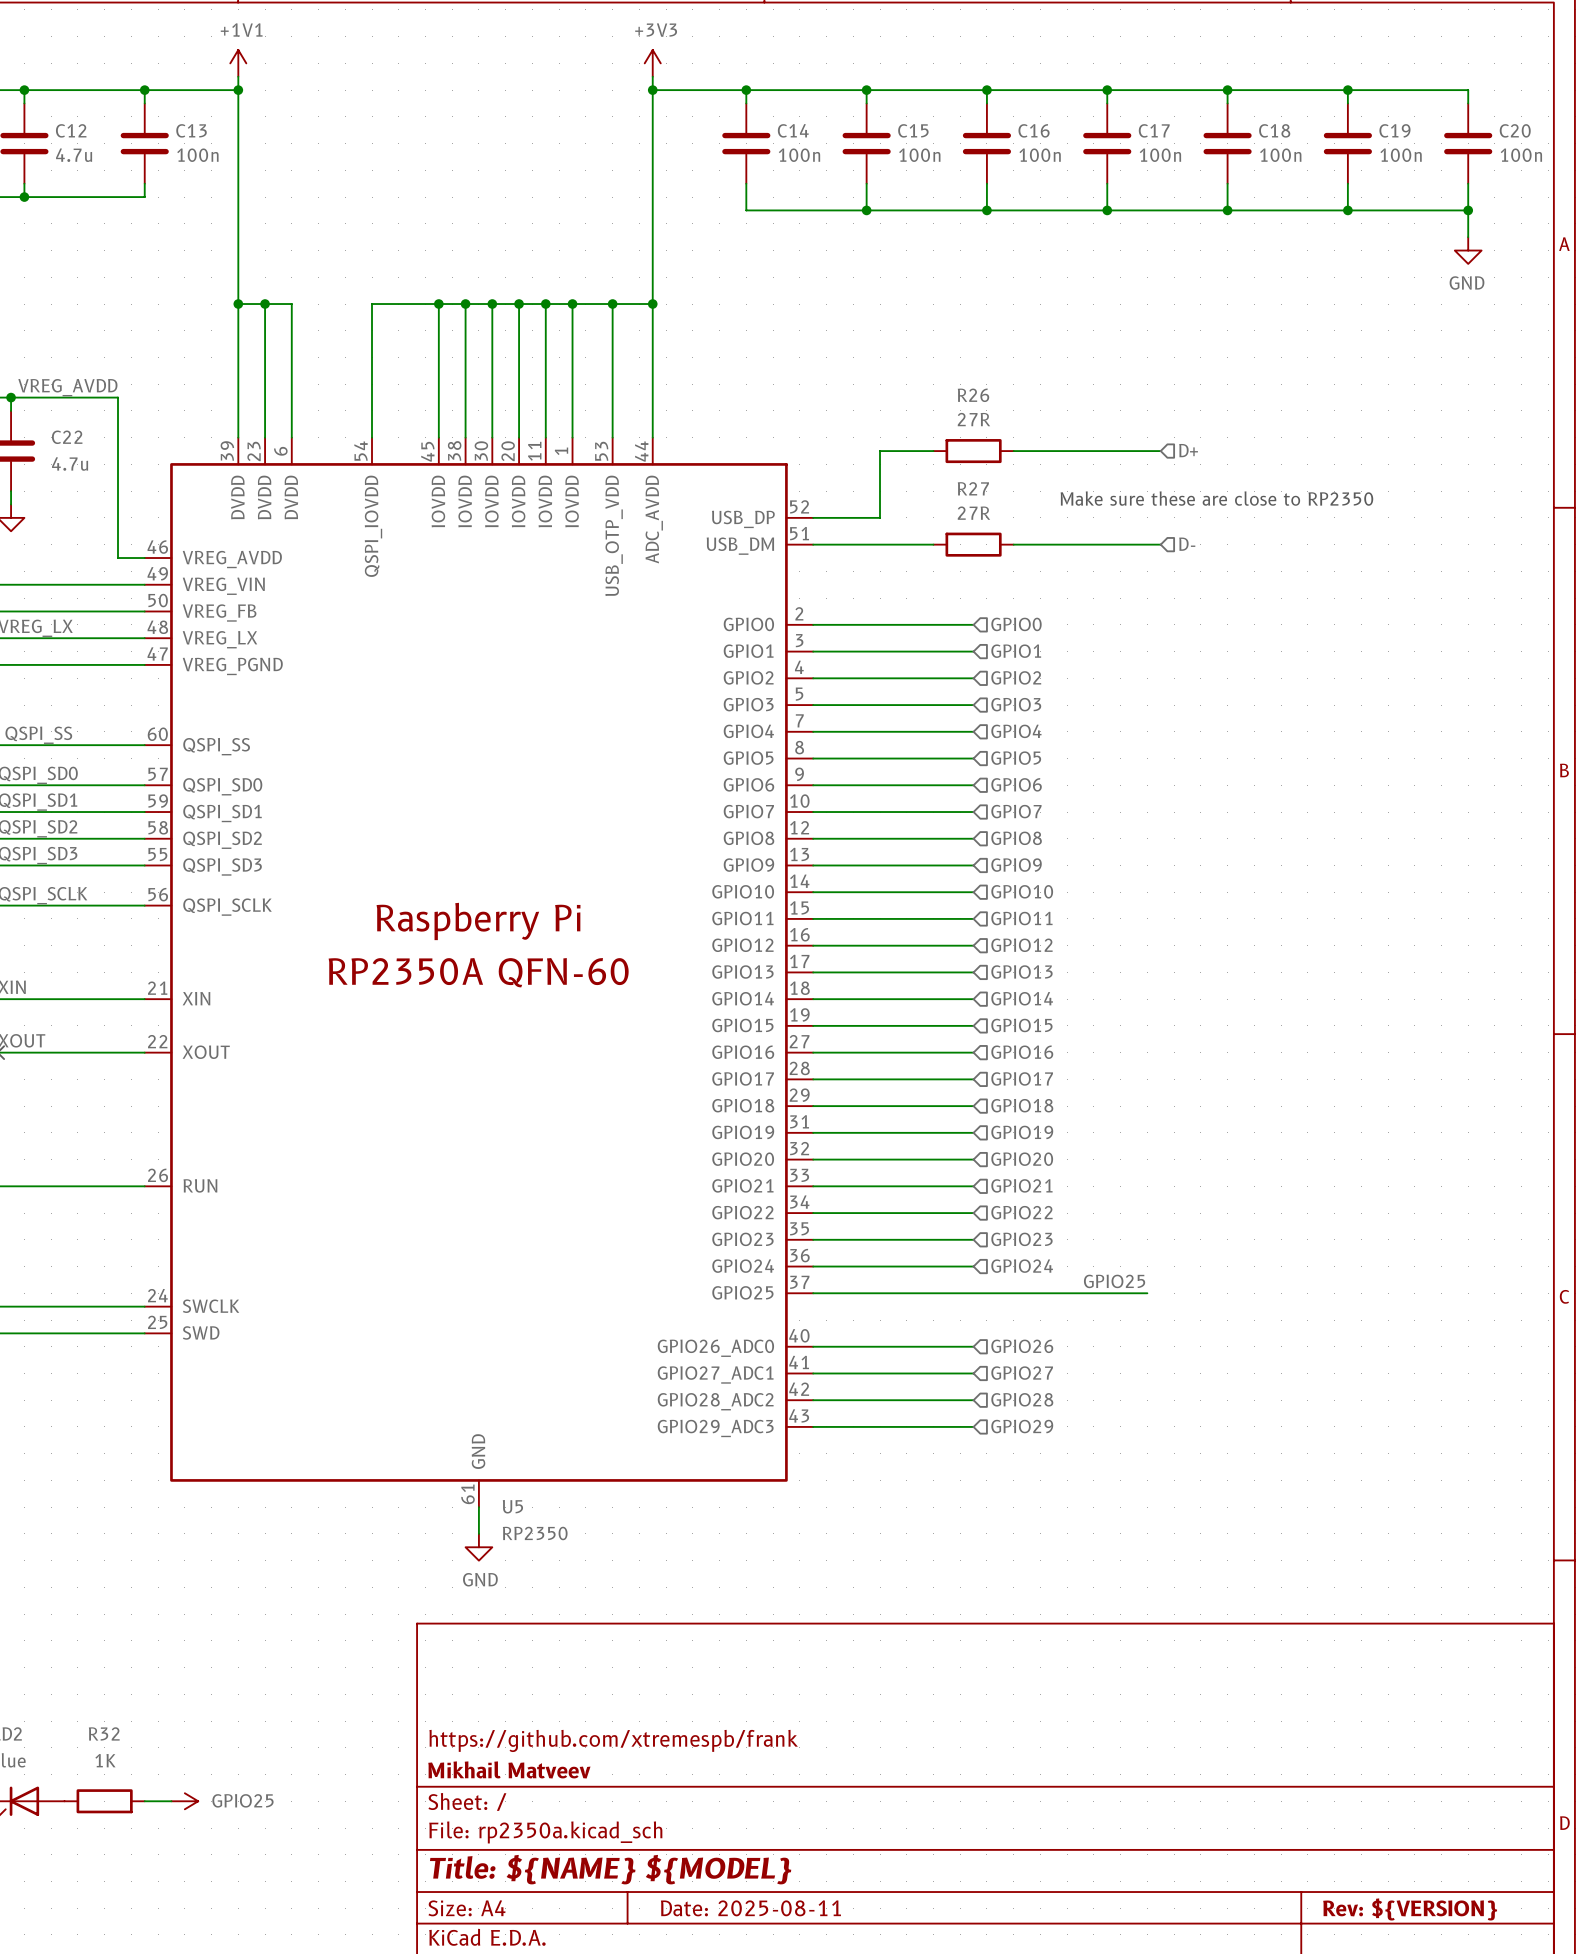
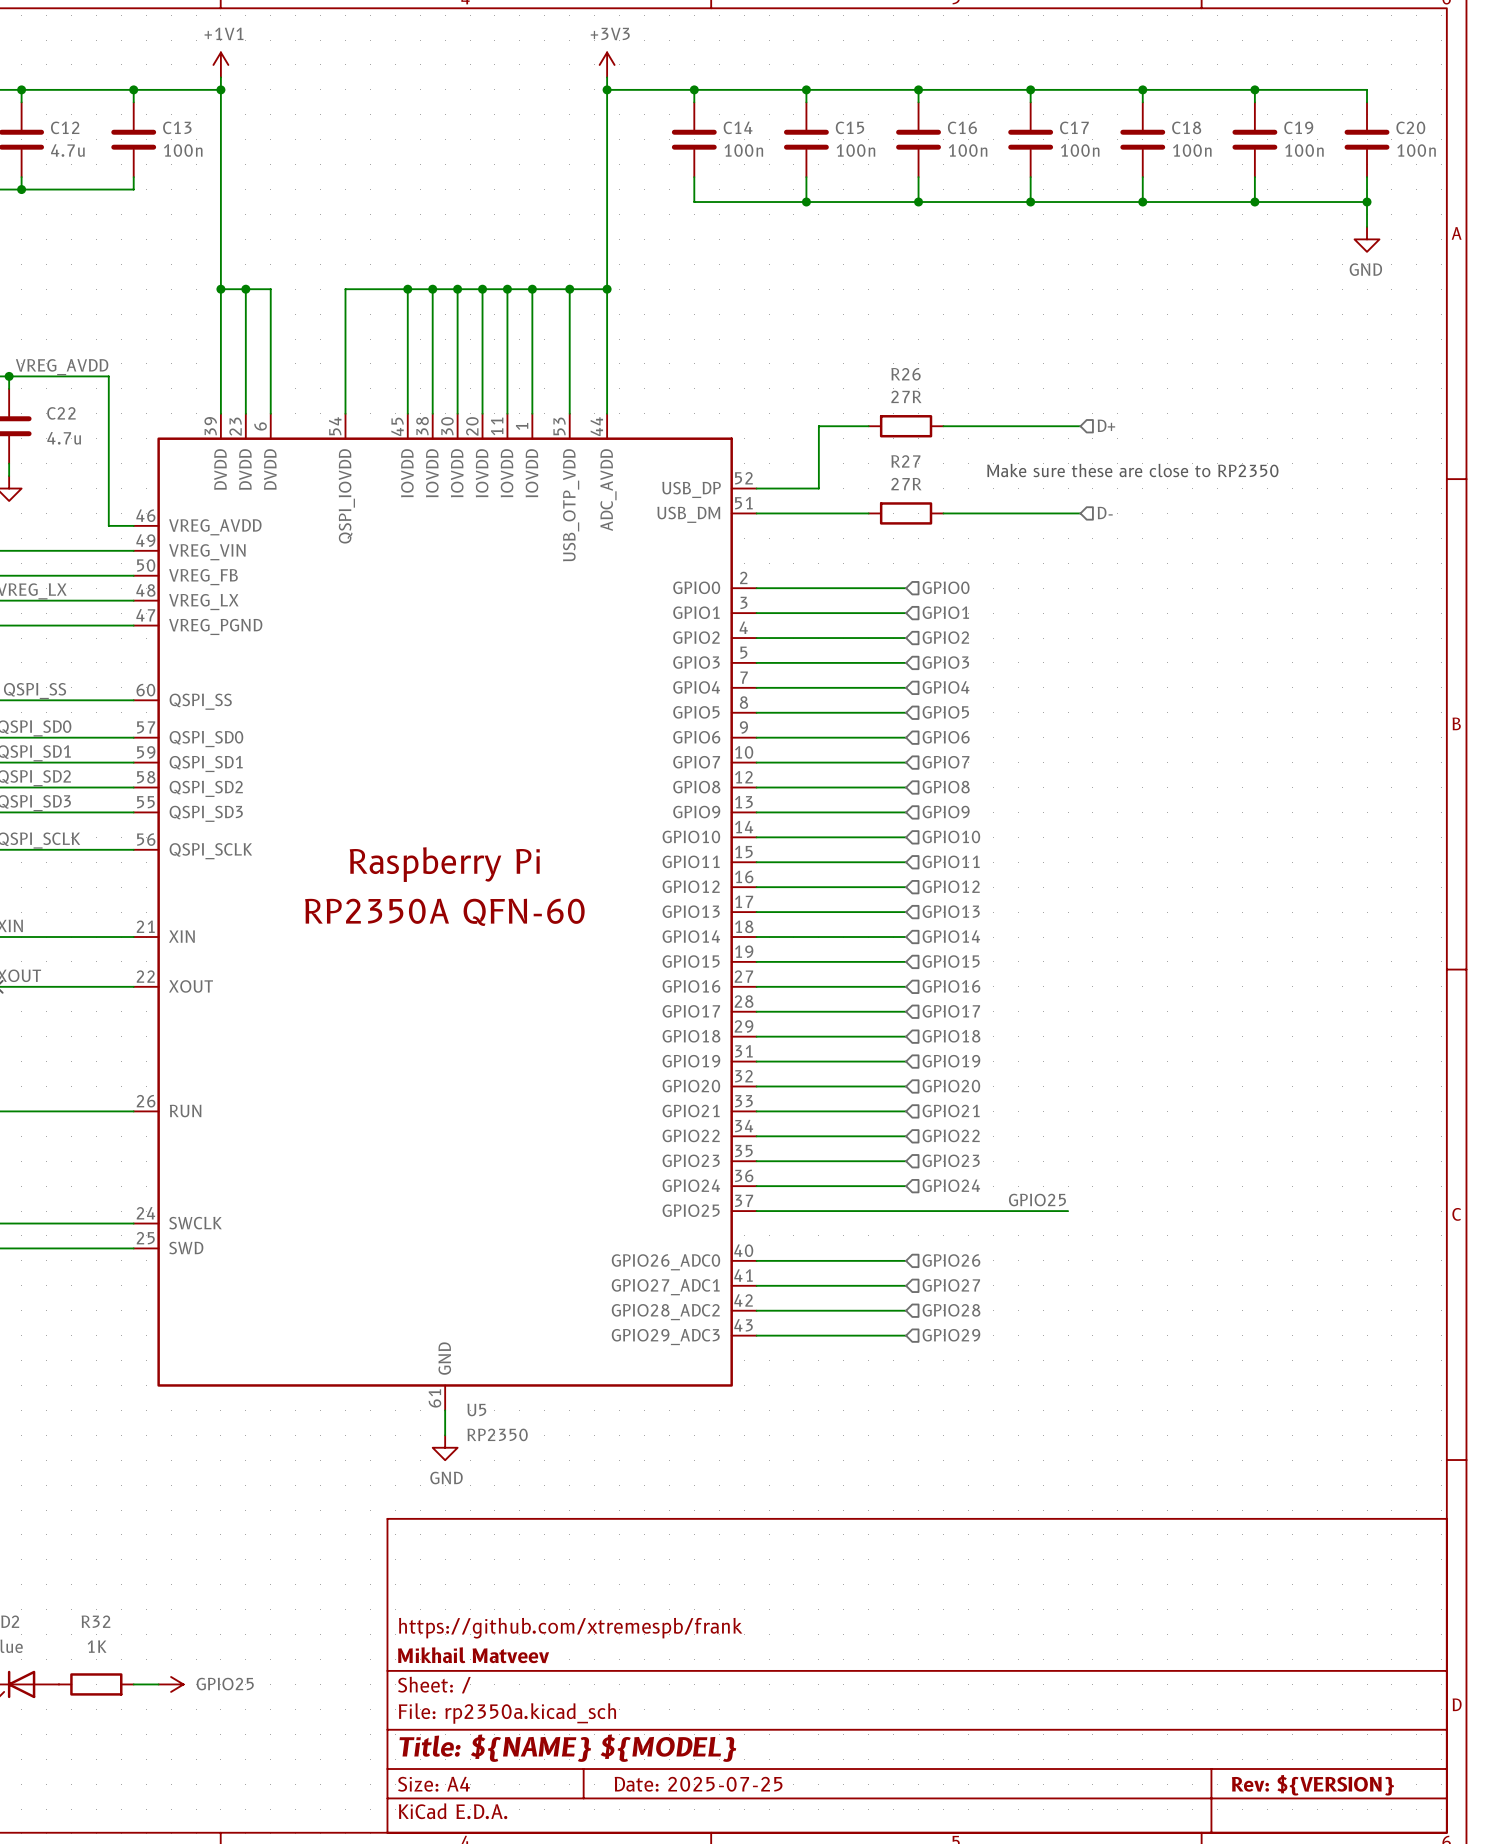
title block: Date: 2025-08-11 (750, 1908) -> Date: 2025-07-25 (698, 1784)

